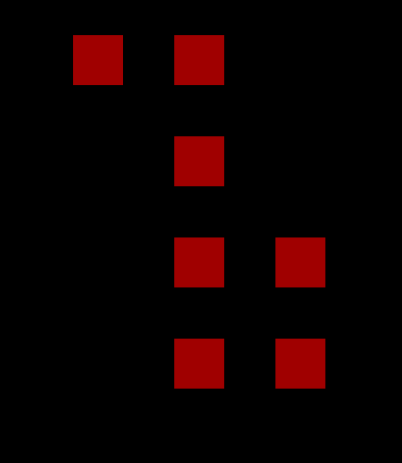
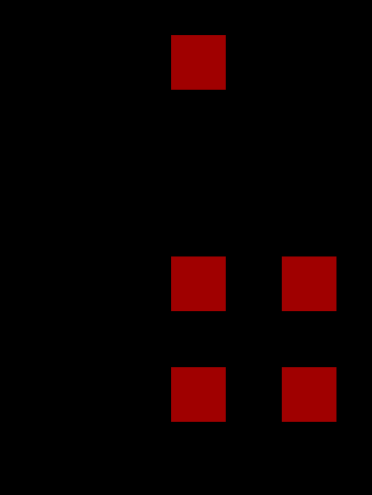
part: (98, 60) -> none
part: (199, 161) -> none

